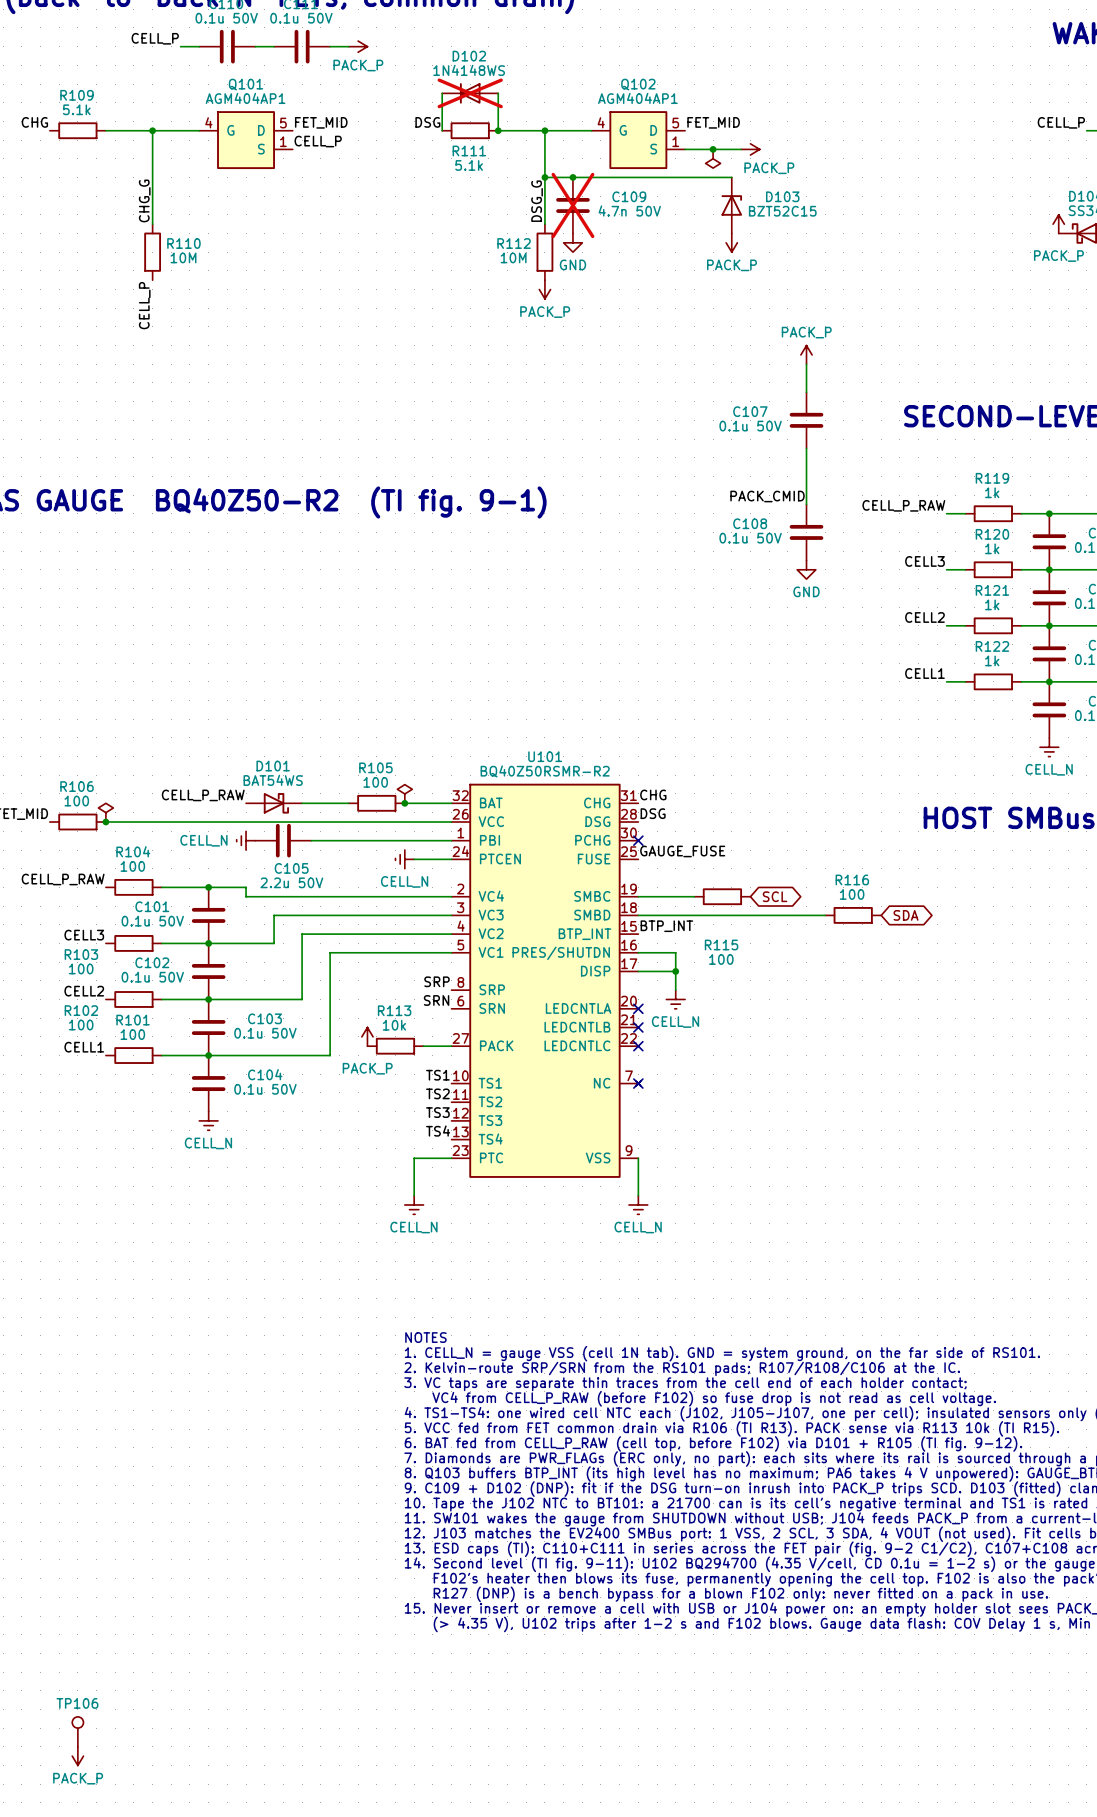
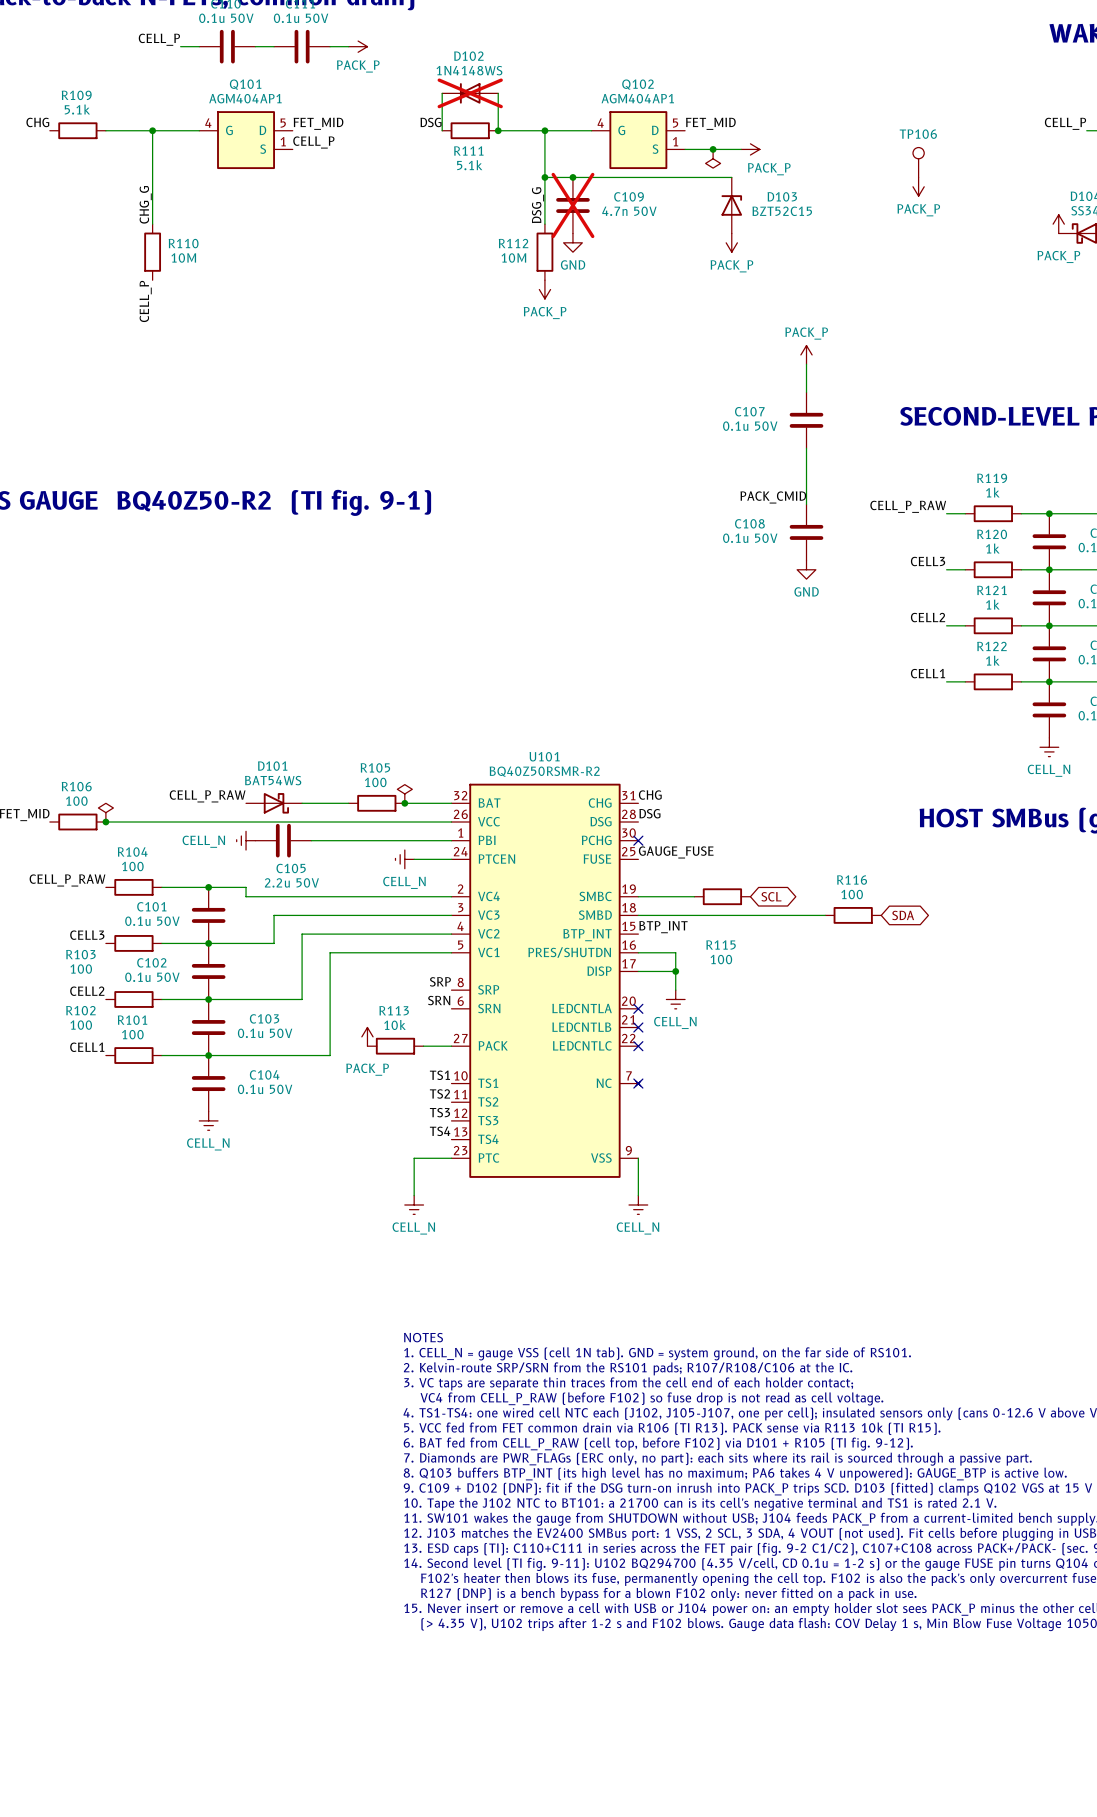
power symbol: none -> PACK_P (918, 186)
TP106 position: (77, 1731) -> (918, 162)
power symbol: PACK_P (77, 1756) -> none

